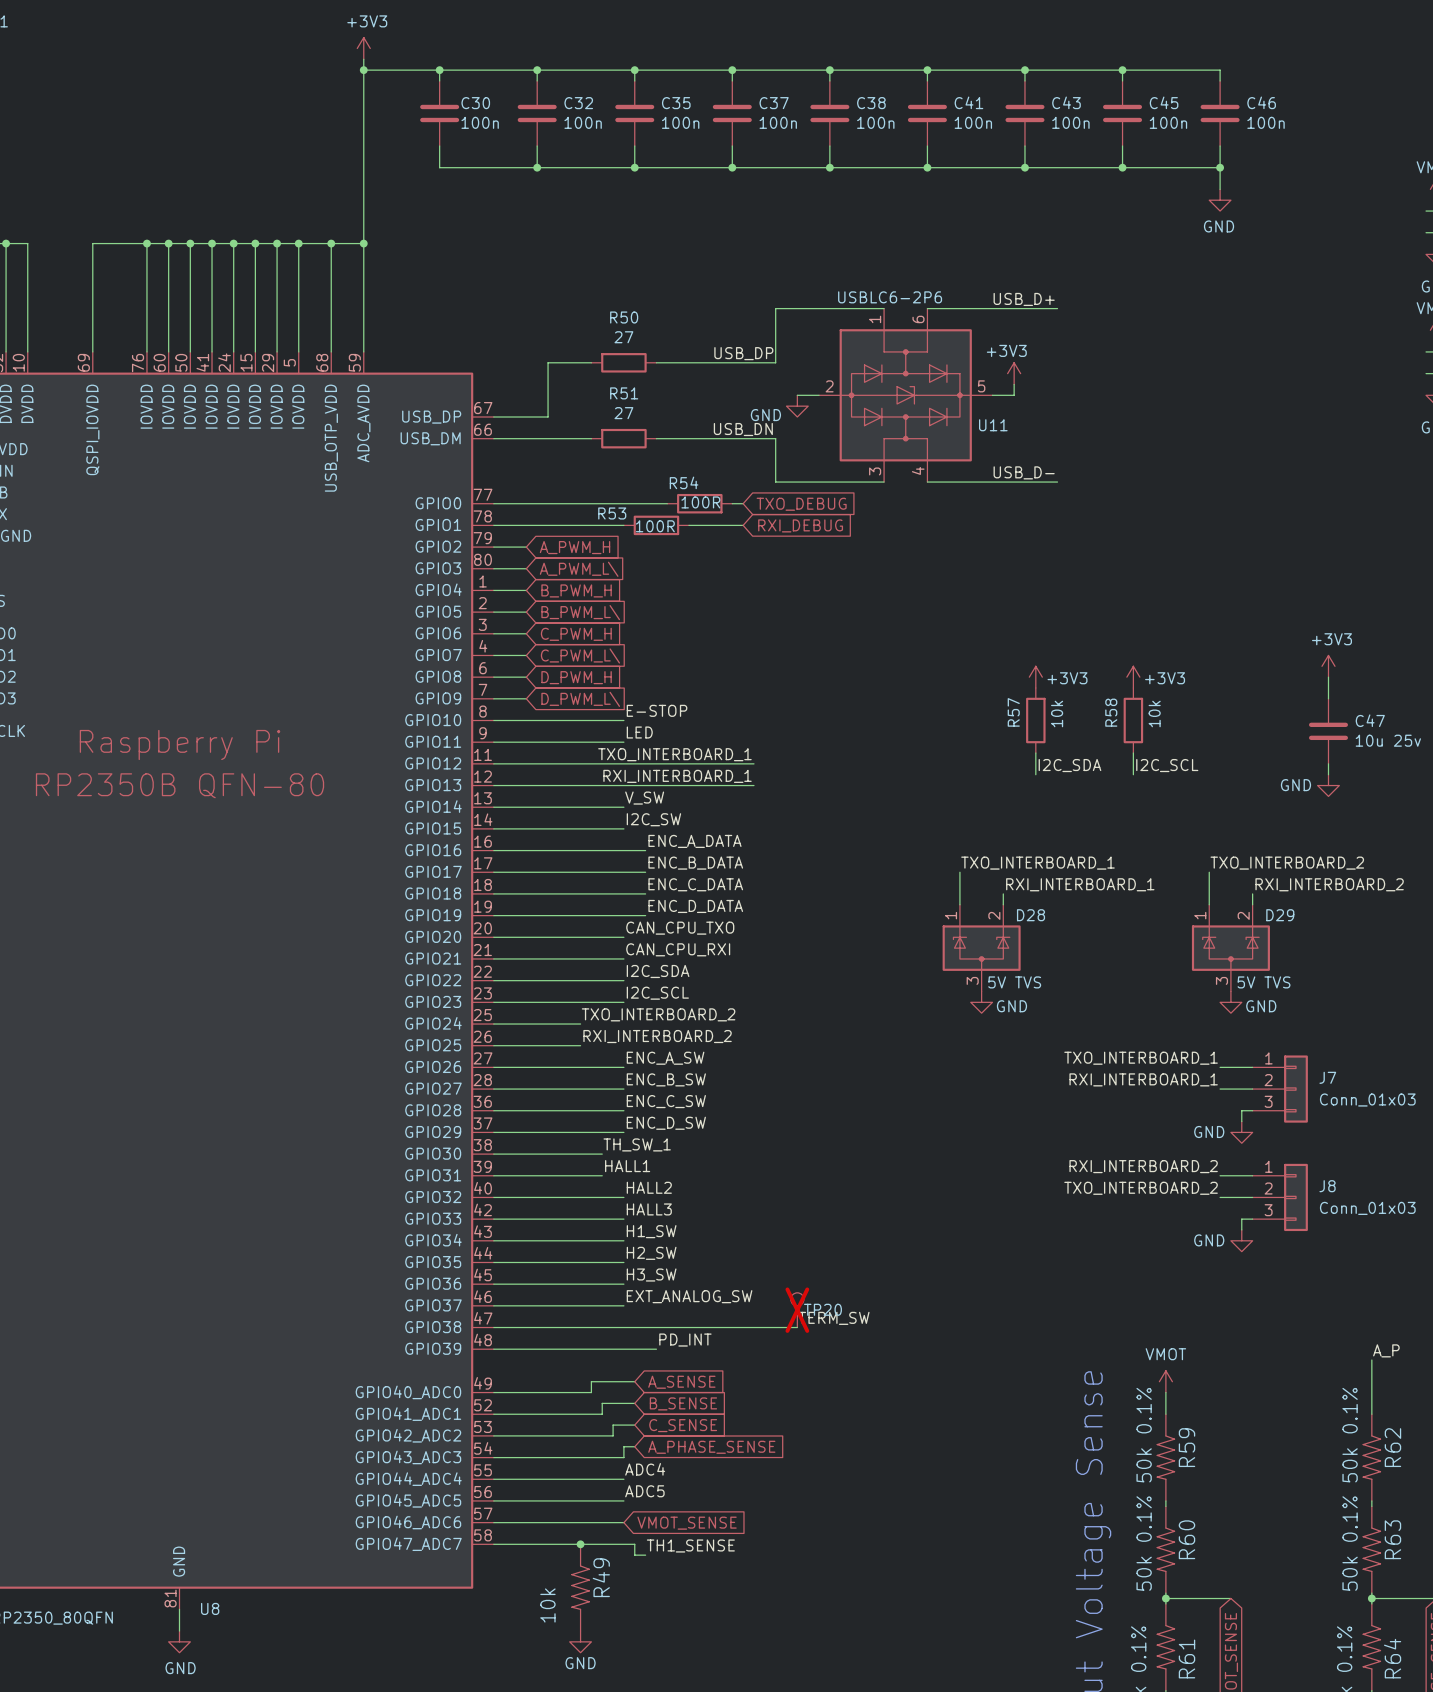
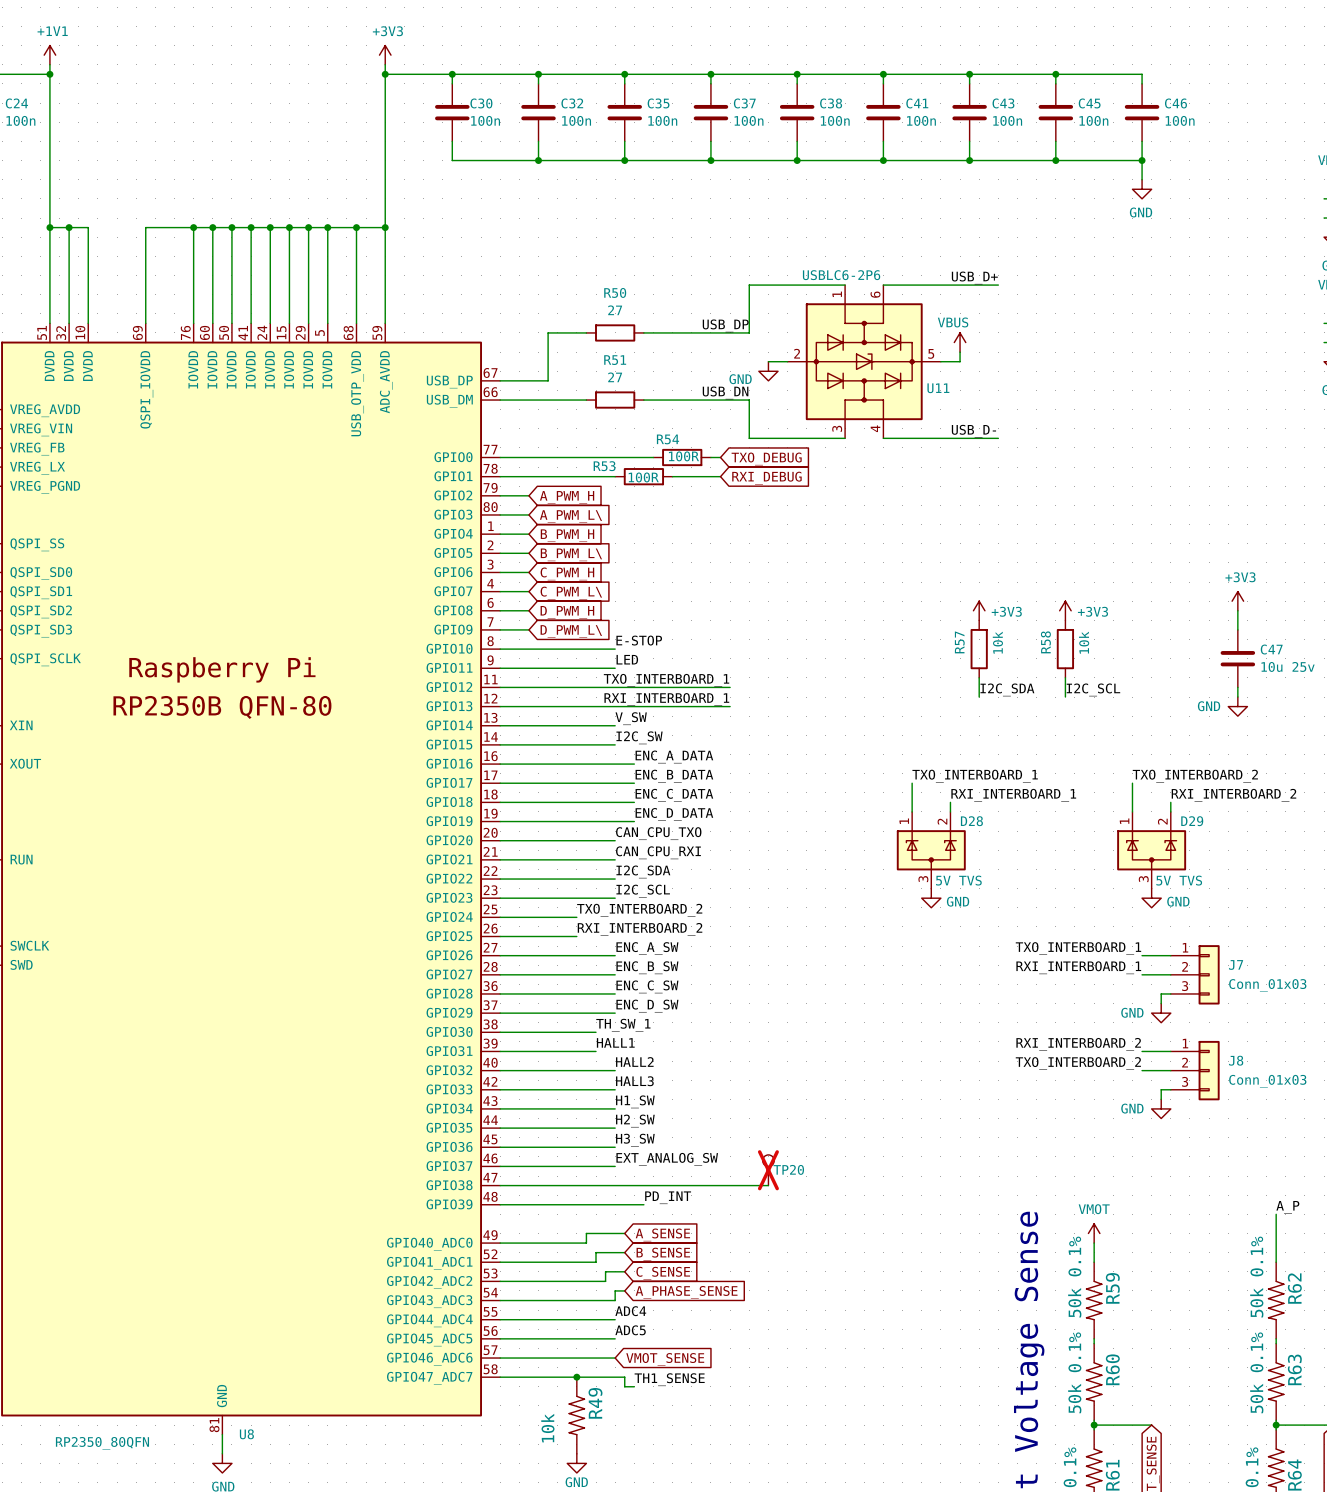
power symbol: +3V3 (1014, 373) -> VBUS (960, 342)
label: TERM_SW (834, 1318) -> none

